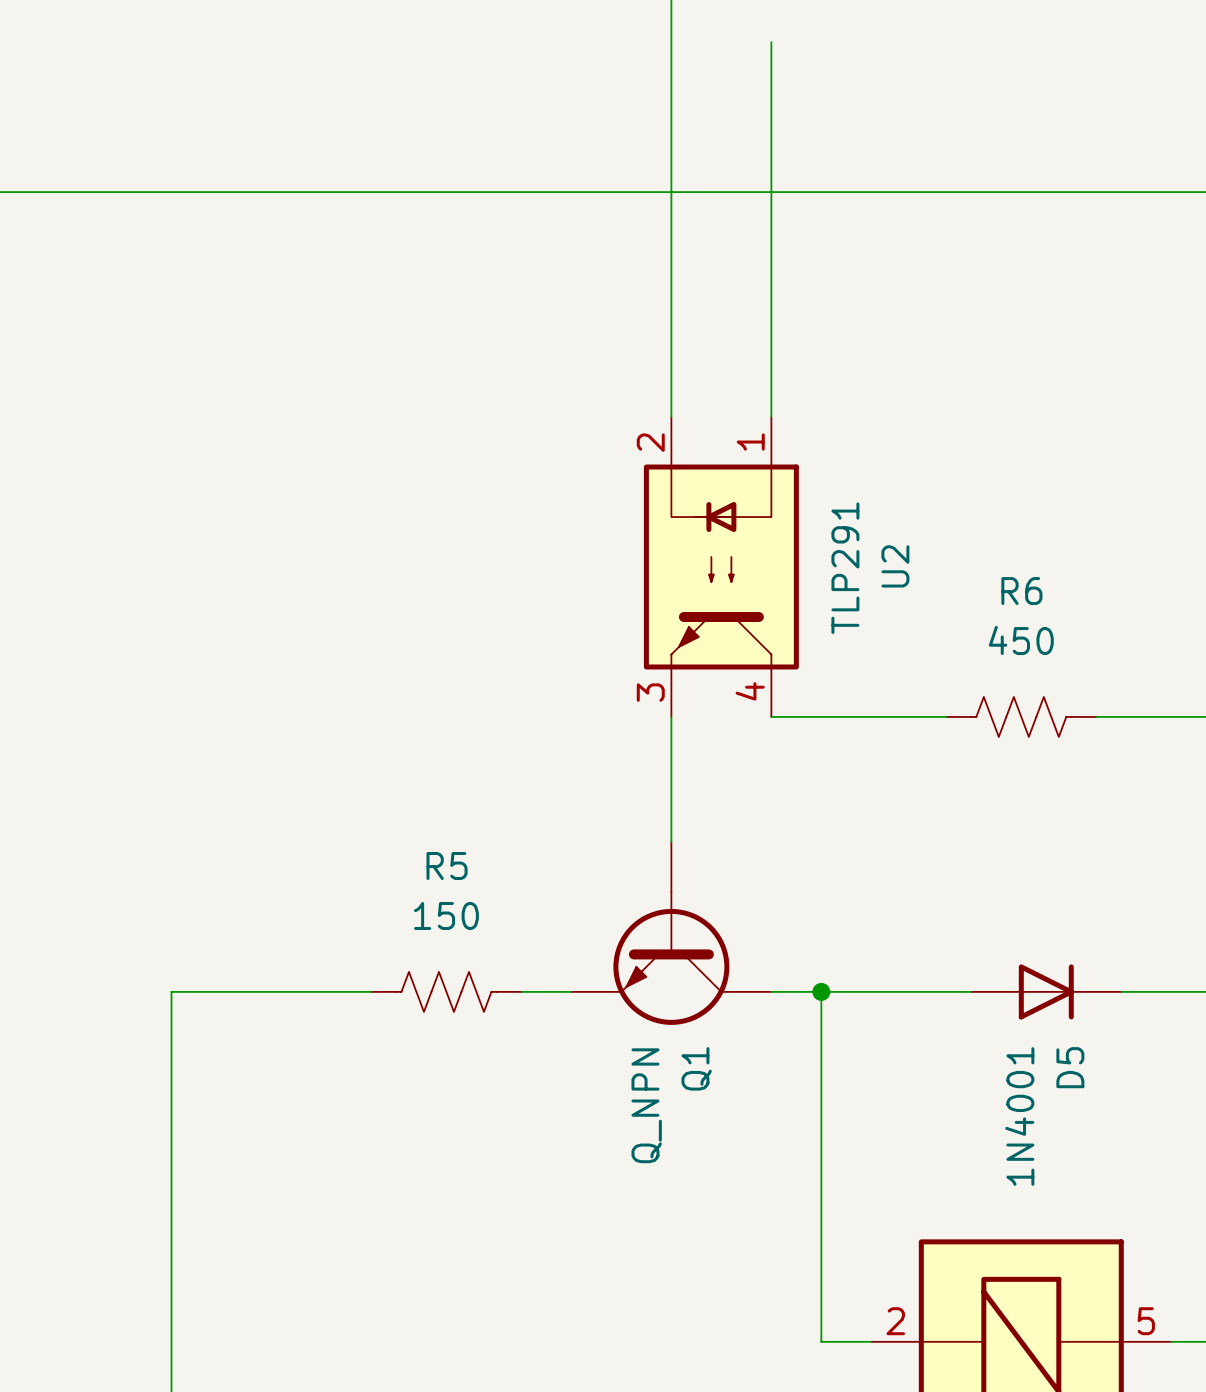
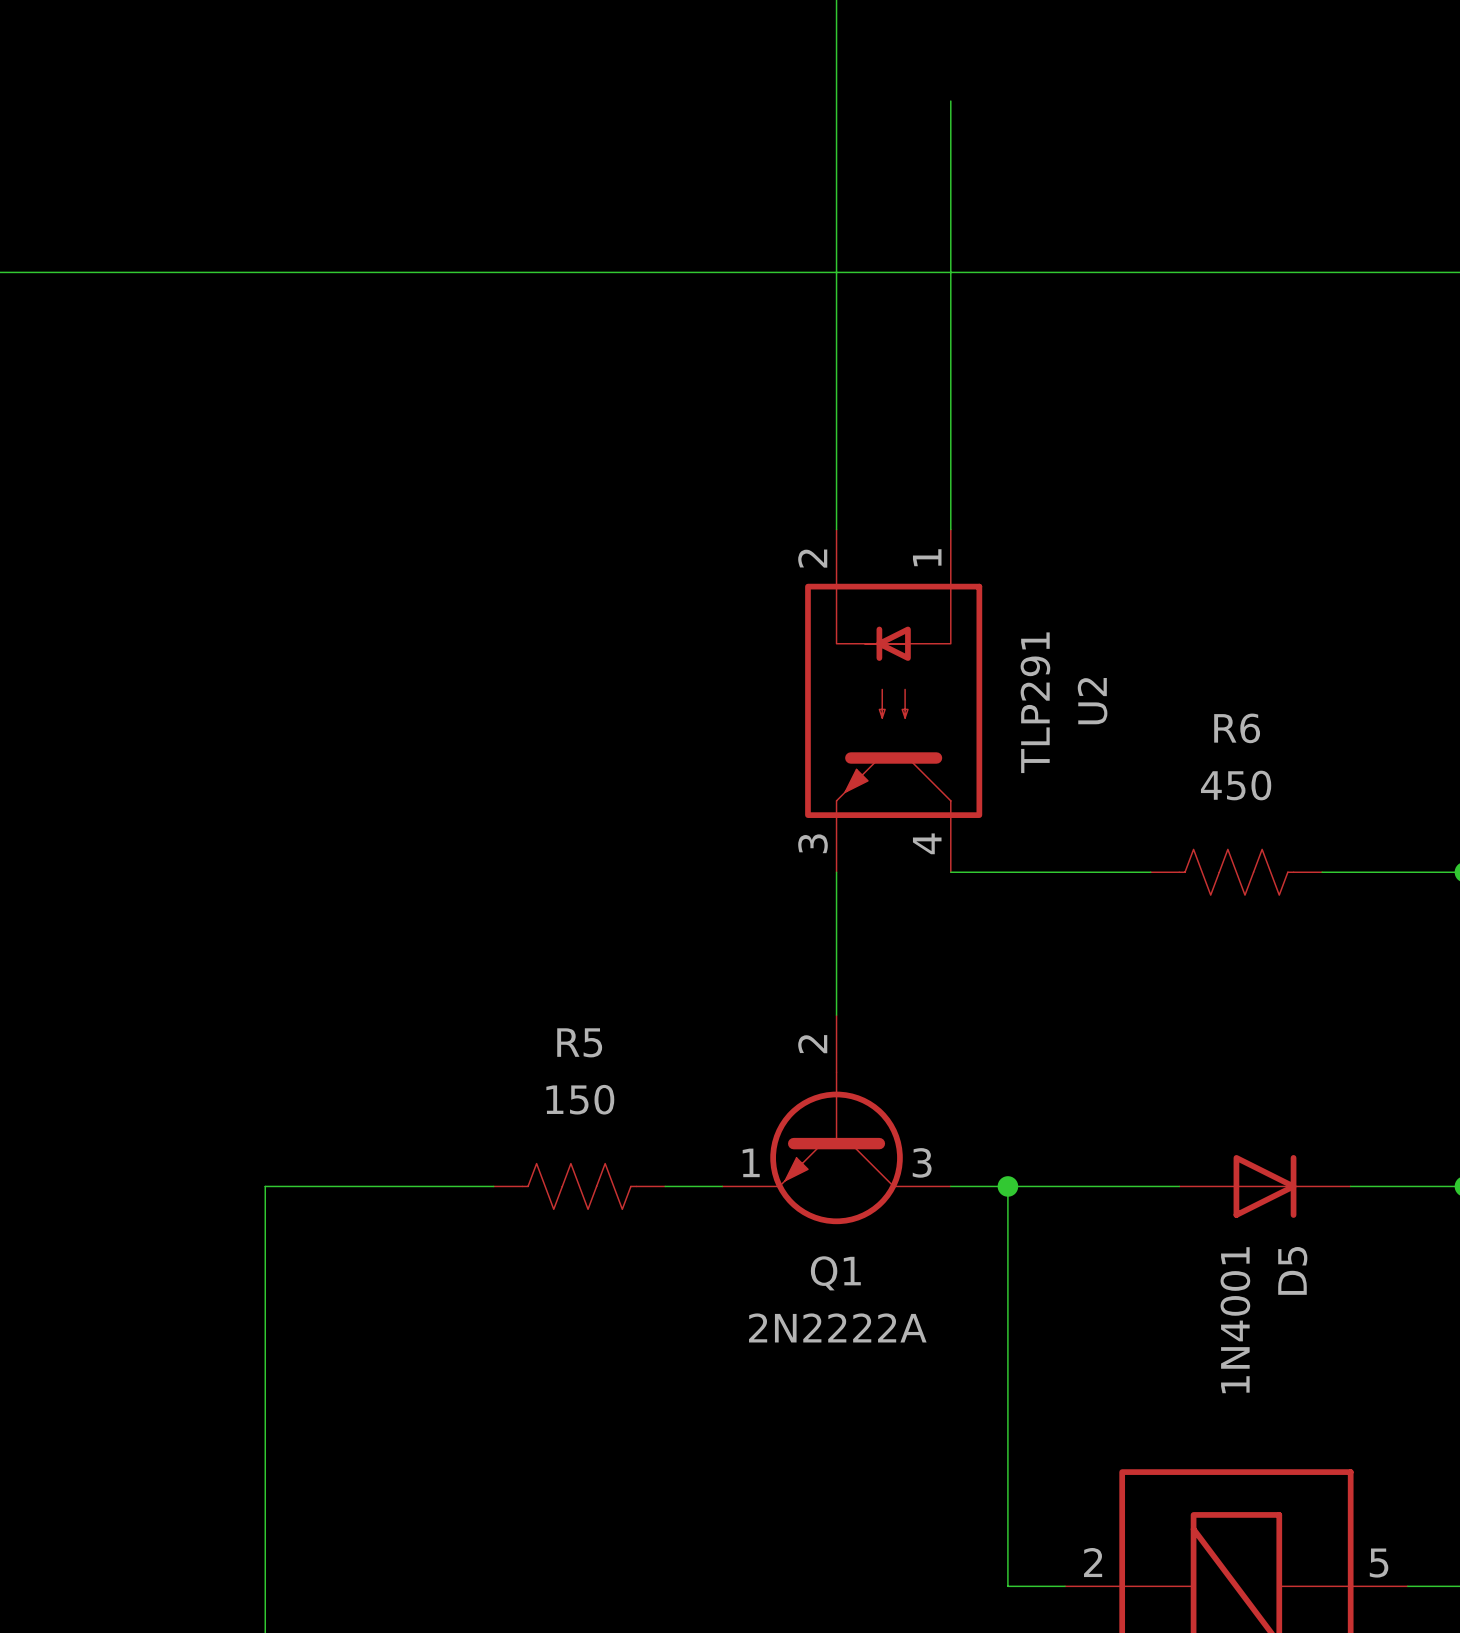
Q1 pin number: none -> 2 (812, 1044)
Q1 pin number: none -> 1 (751, 1162)
Q1 pin number: none -> 3 (922, 1162)
Q1 name rotation: 0° (696, 1068) -> 90° clockwise (835, 1273)
Q1 value: Q_NPN (646, 1105) -> 2N2222A (837, 1327)

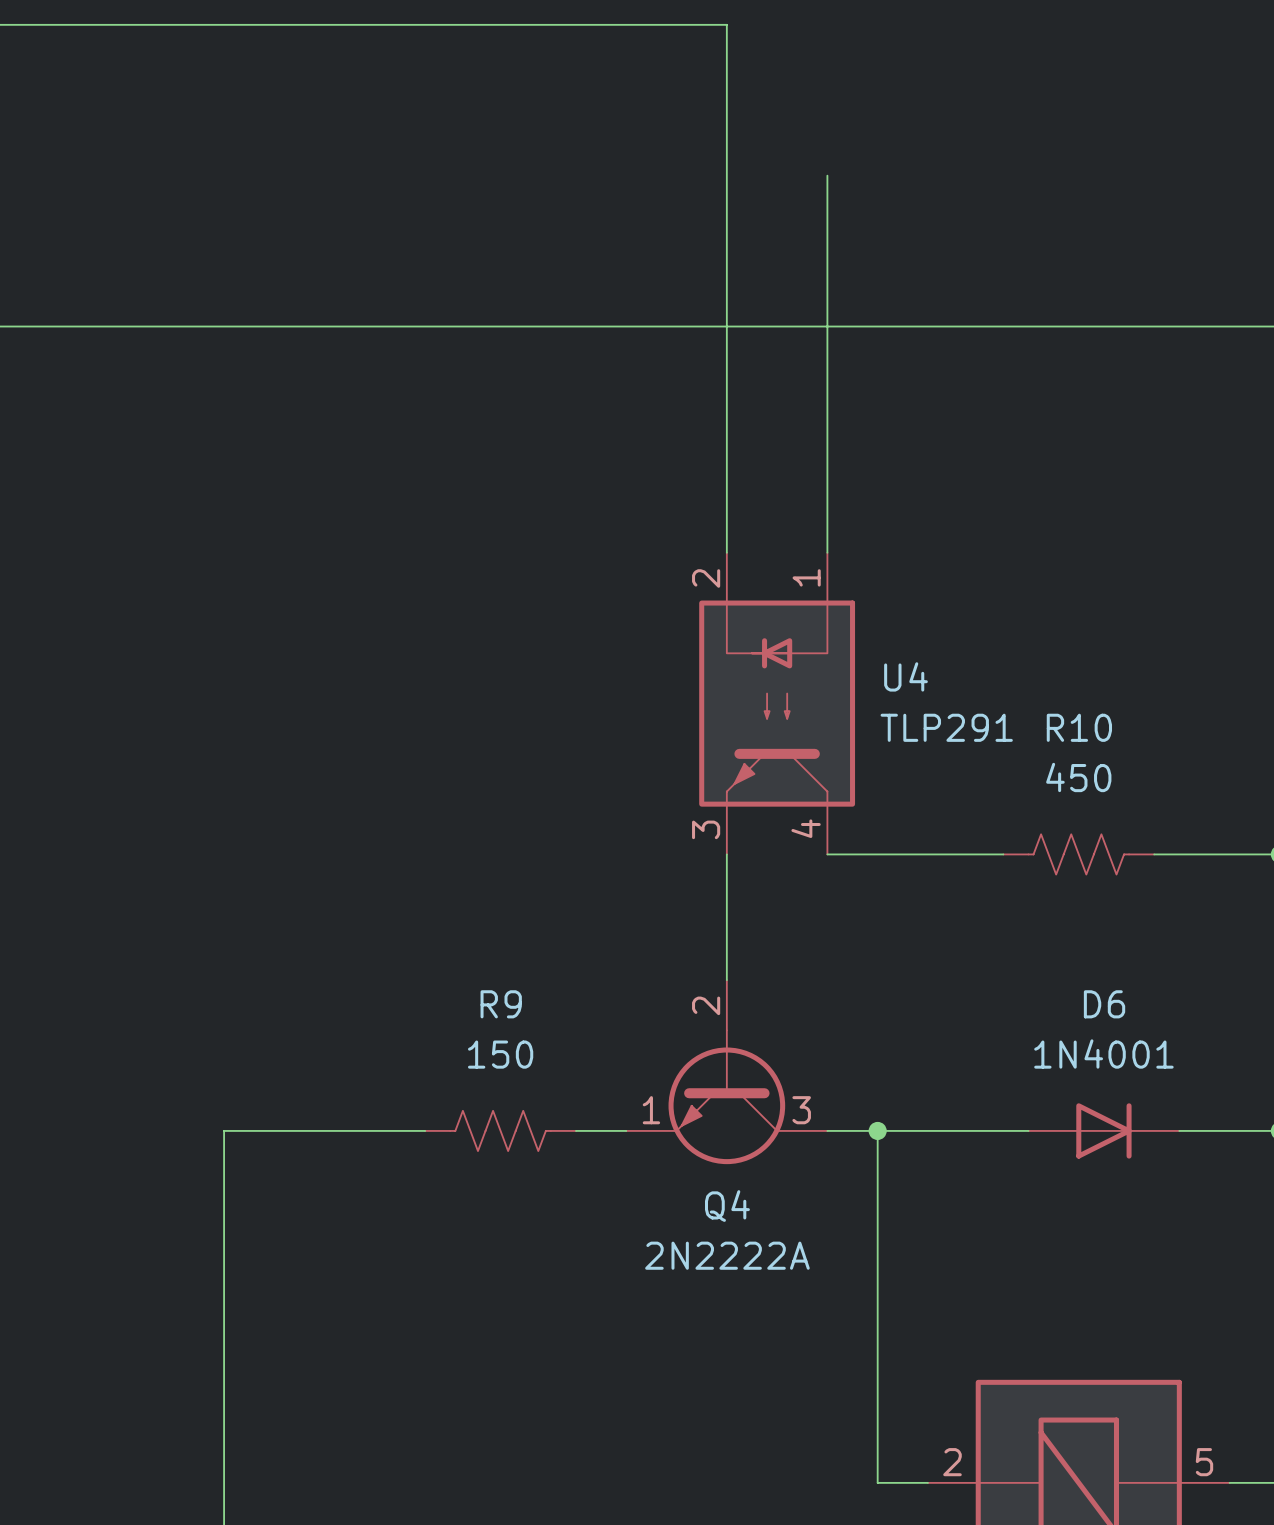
U2 name: U2 (1092, 701) -> U4 (906, 676)
U2 value rotation: 0° (1035, 702) -> 90° clockwise (946, 727)
R6 name: R6 (1237, 728) -> R10 (1079, 727)
R5 name: R5 (579, 1042) -> R9 (501, 1004)
D5 name: D5 (1292, 1270) -> D6 (1104, 1004)
Q1 name: Q1 (835, 1273) -> Q4 (727, 1206)
D5 value rotation: 0° (1235, 1320) -> 90° clockwise (1103, 1053)
D5 value position: 1N4001 (1235, 1320) -> 1N4001 (1103, 1053)

